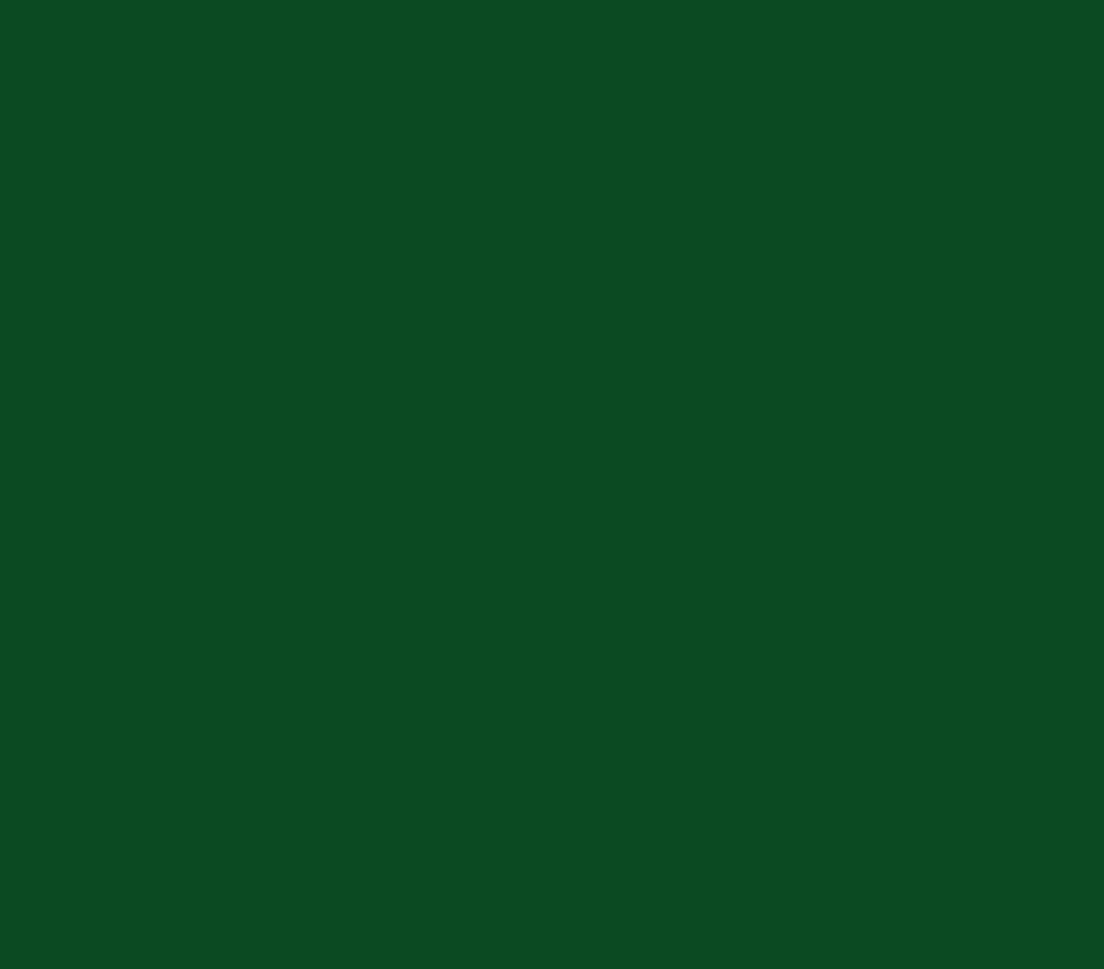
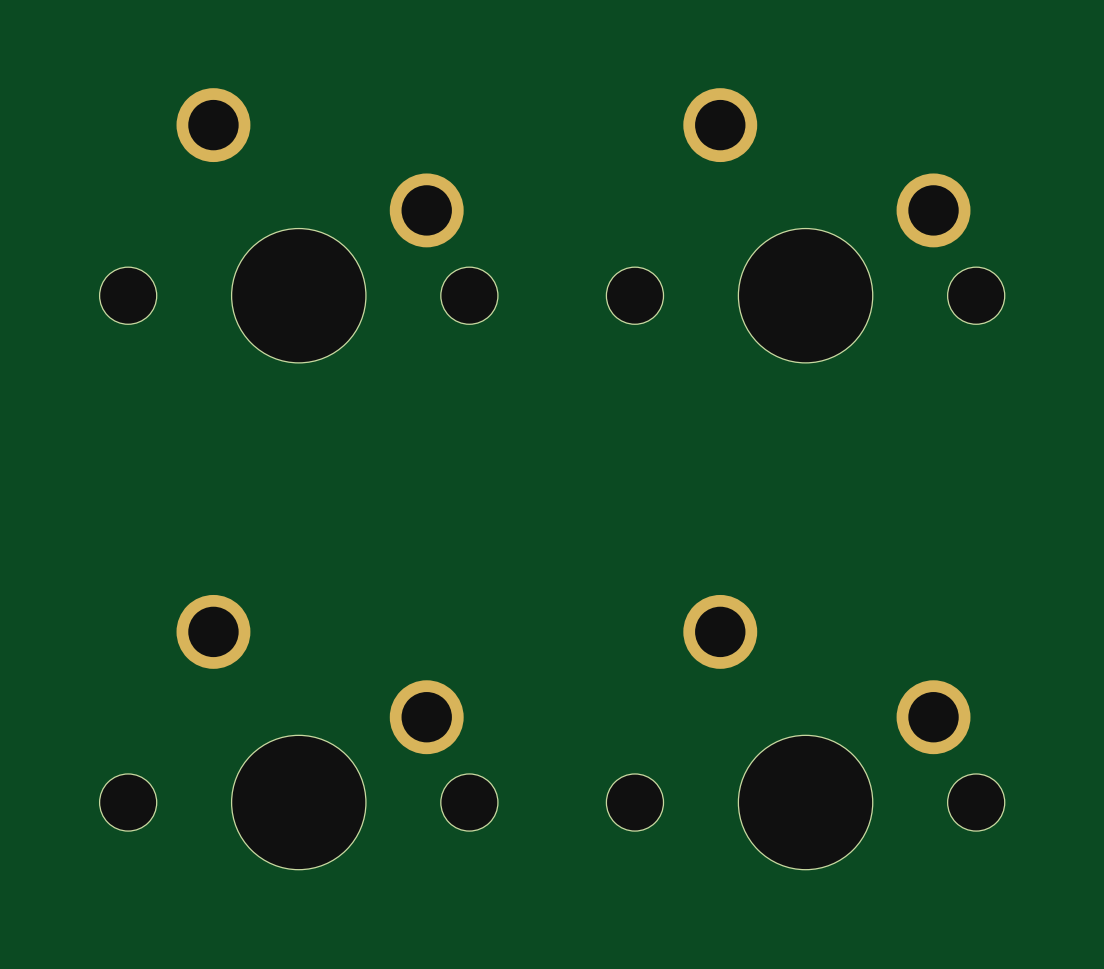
part: none -> (298, 225)
part: none -> (805, 225)
part: none -> (298, 732)
part: none -> (805, 732)

